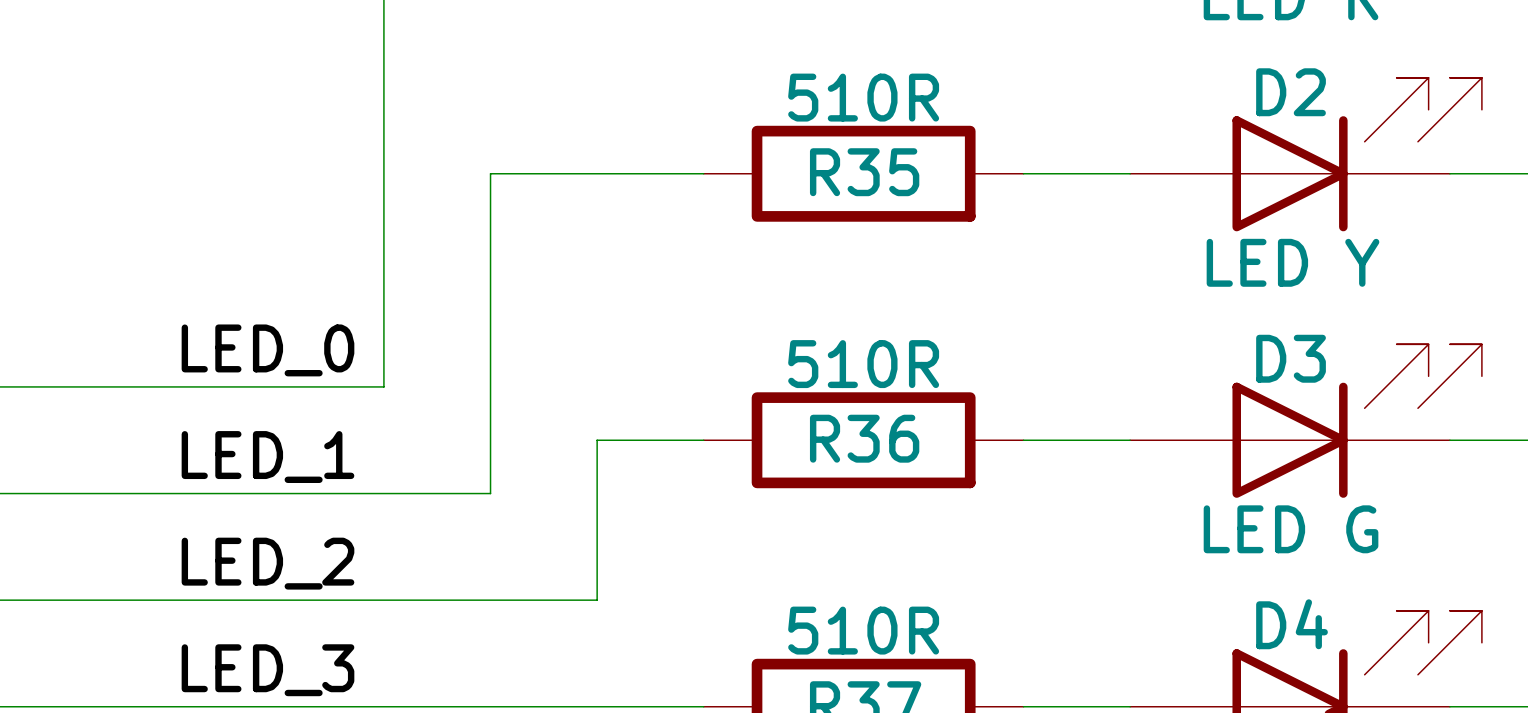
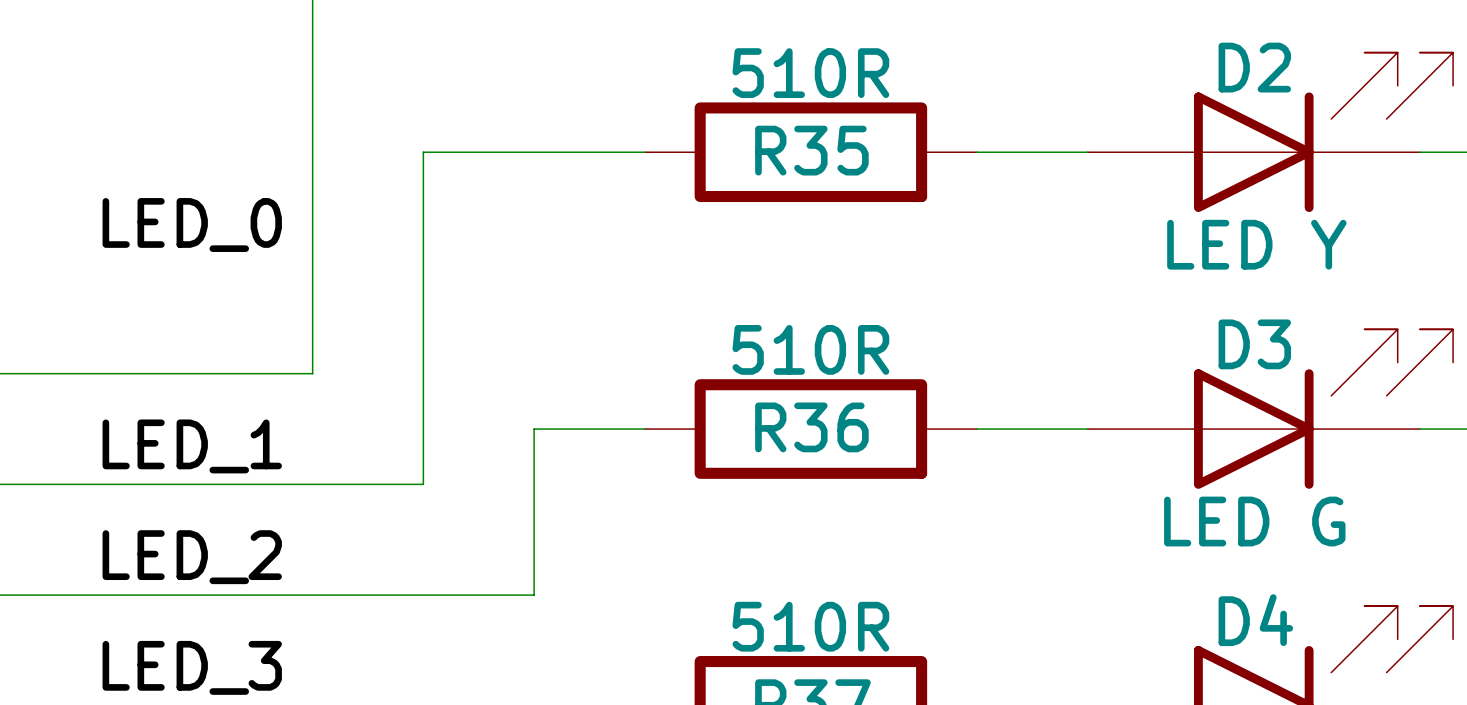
label position: LED_0 (267, 350) -> LED_0 (192, 225)

